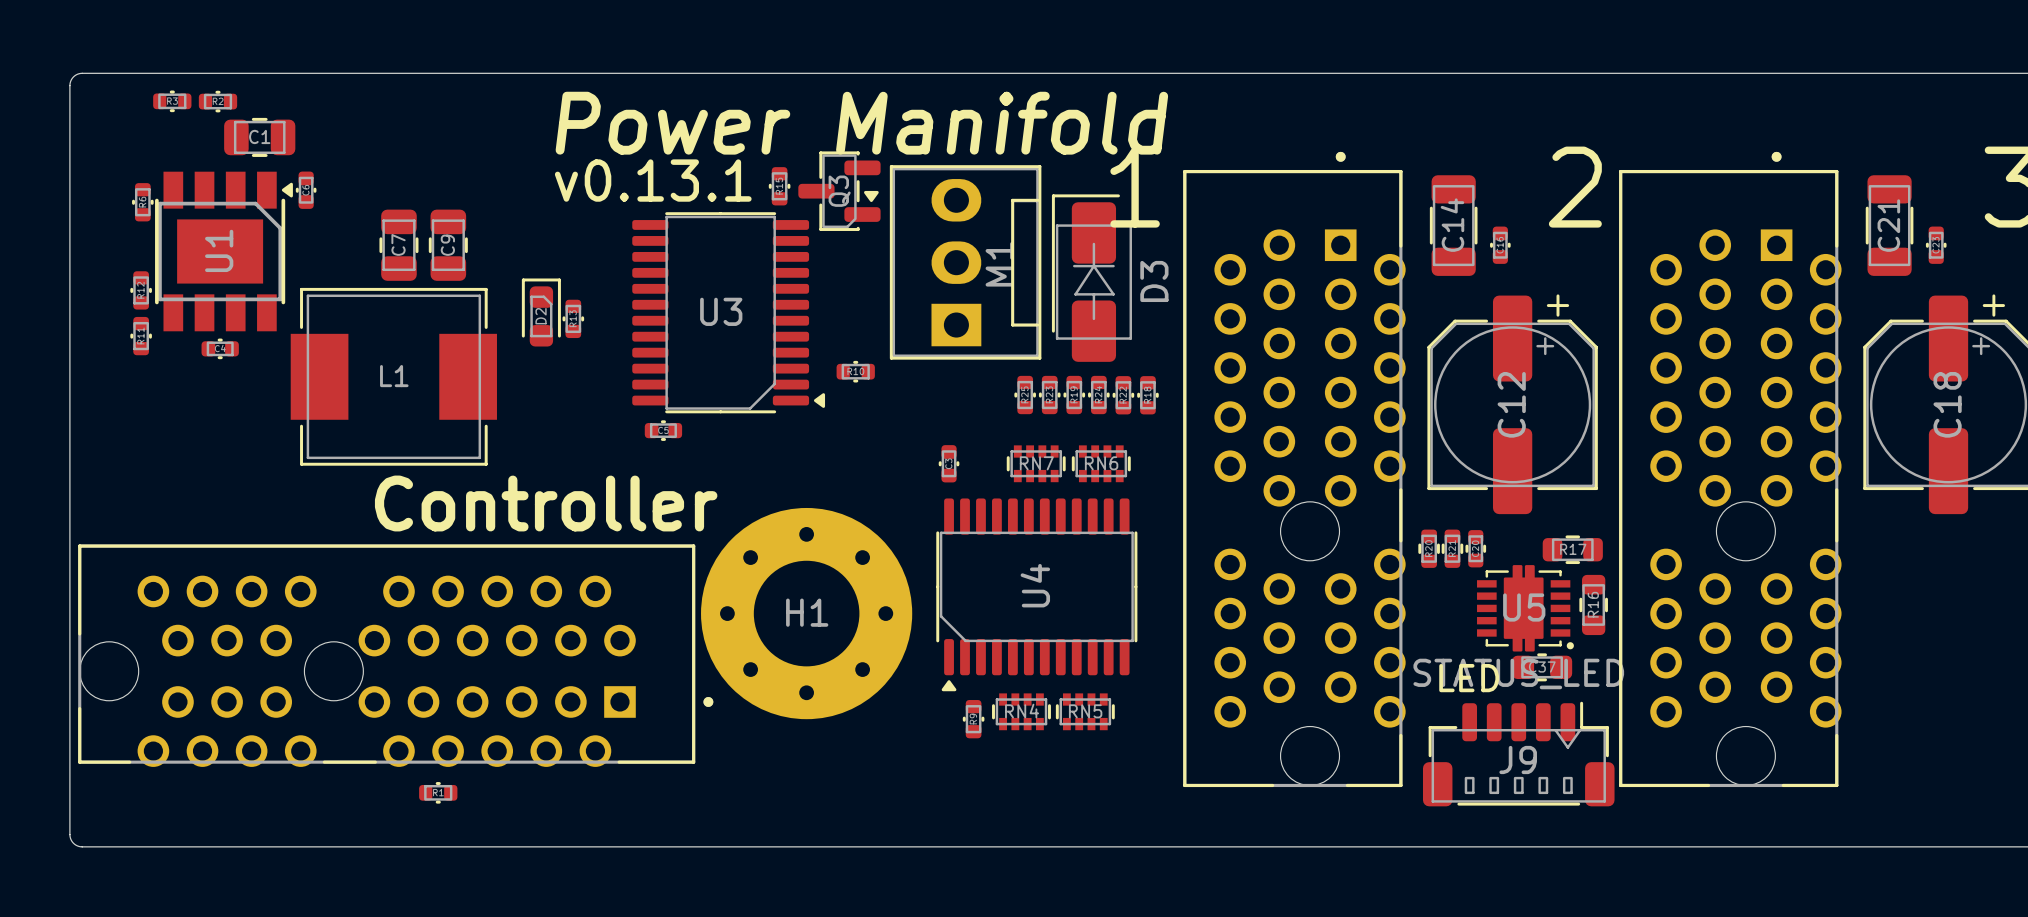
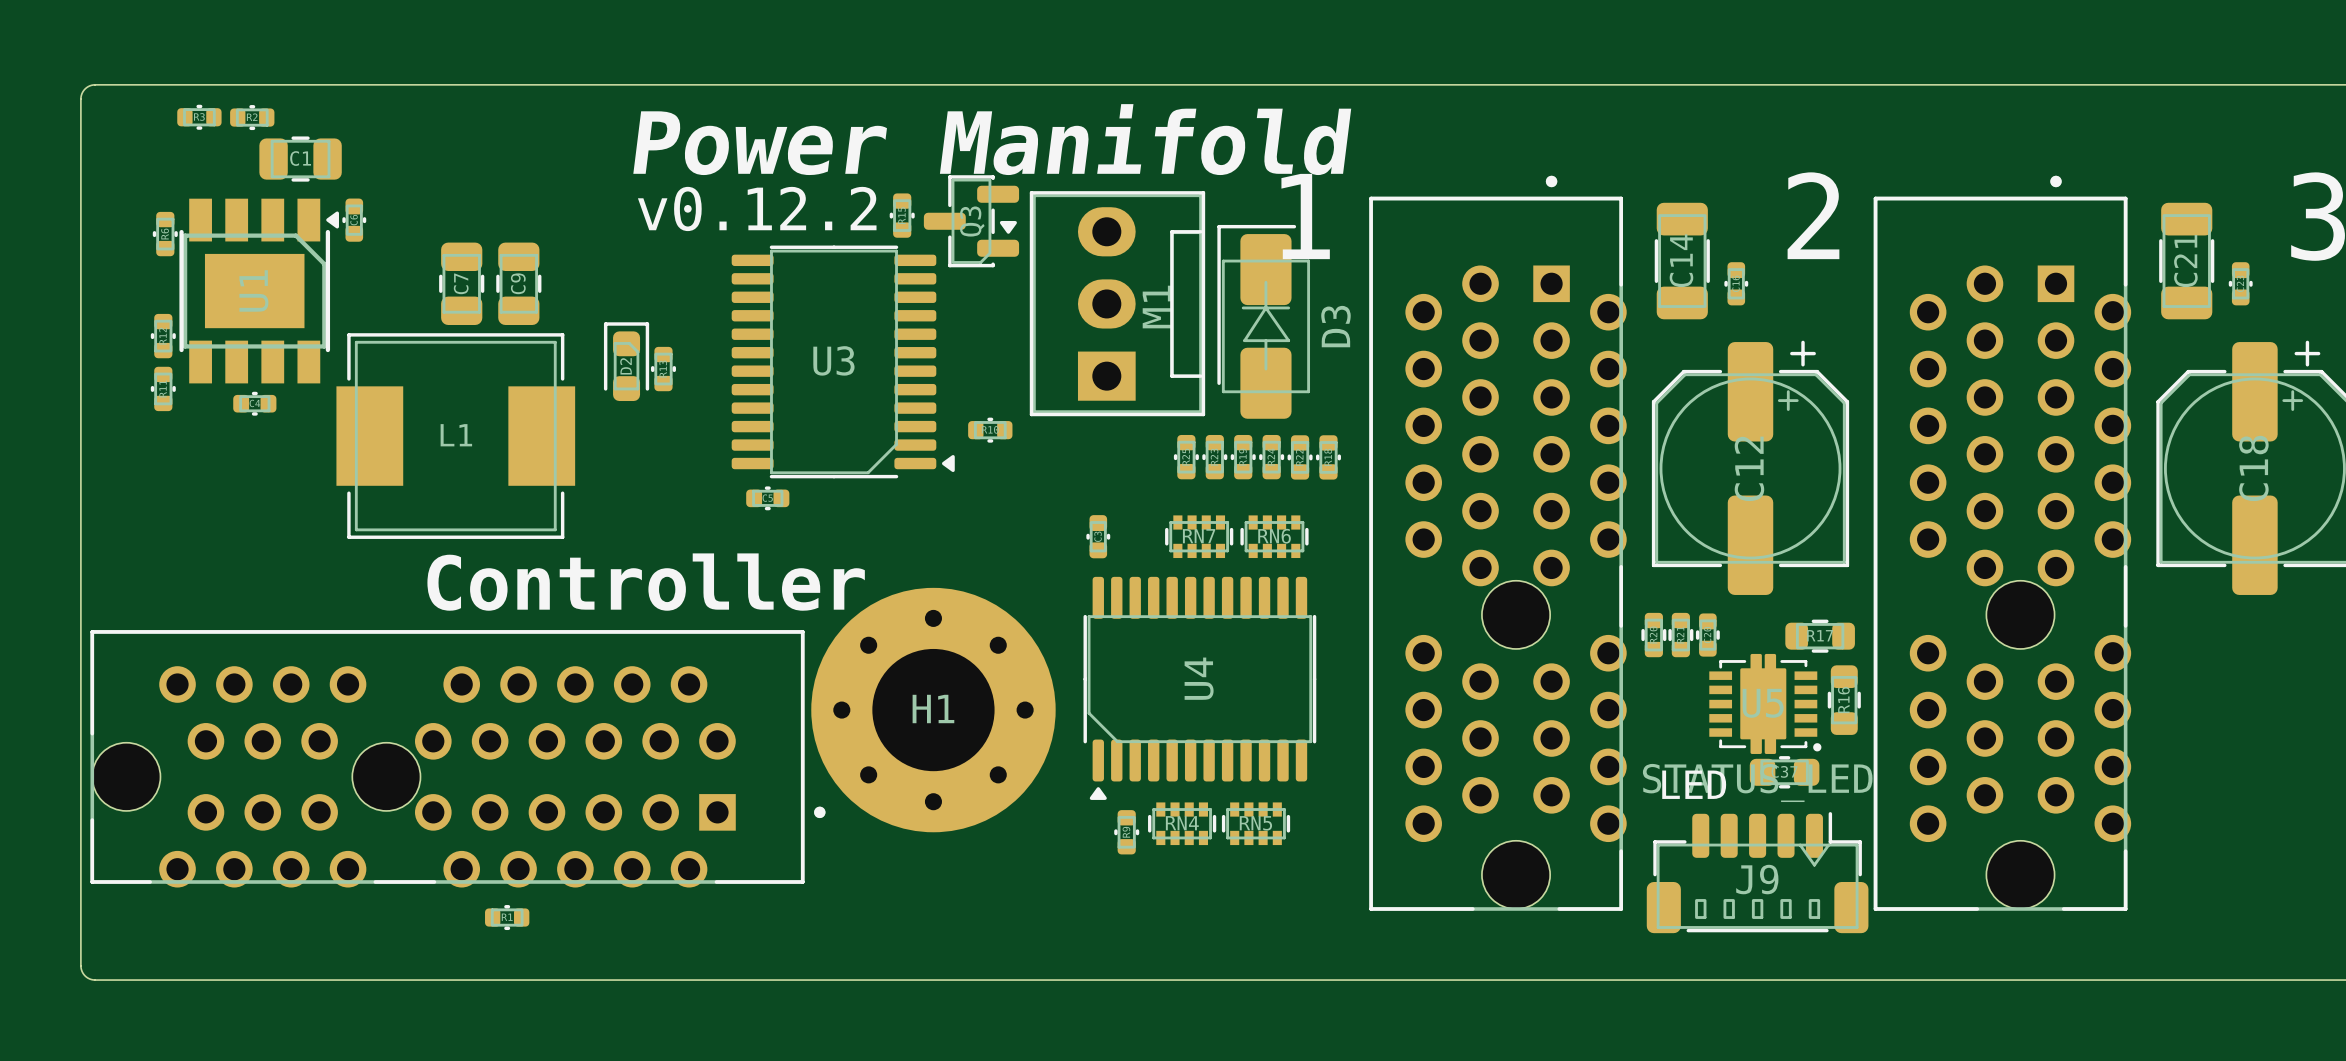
text: v0.13.1 (653, 180) -> v0.12.2 (757, 208)

